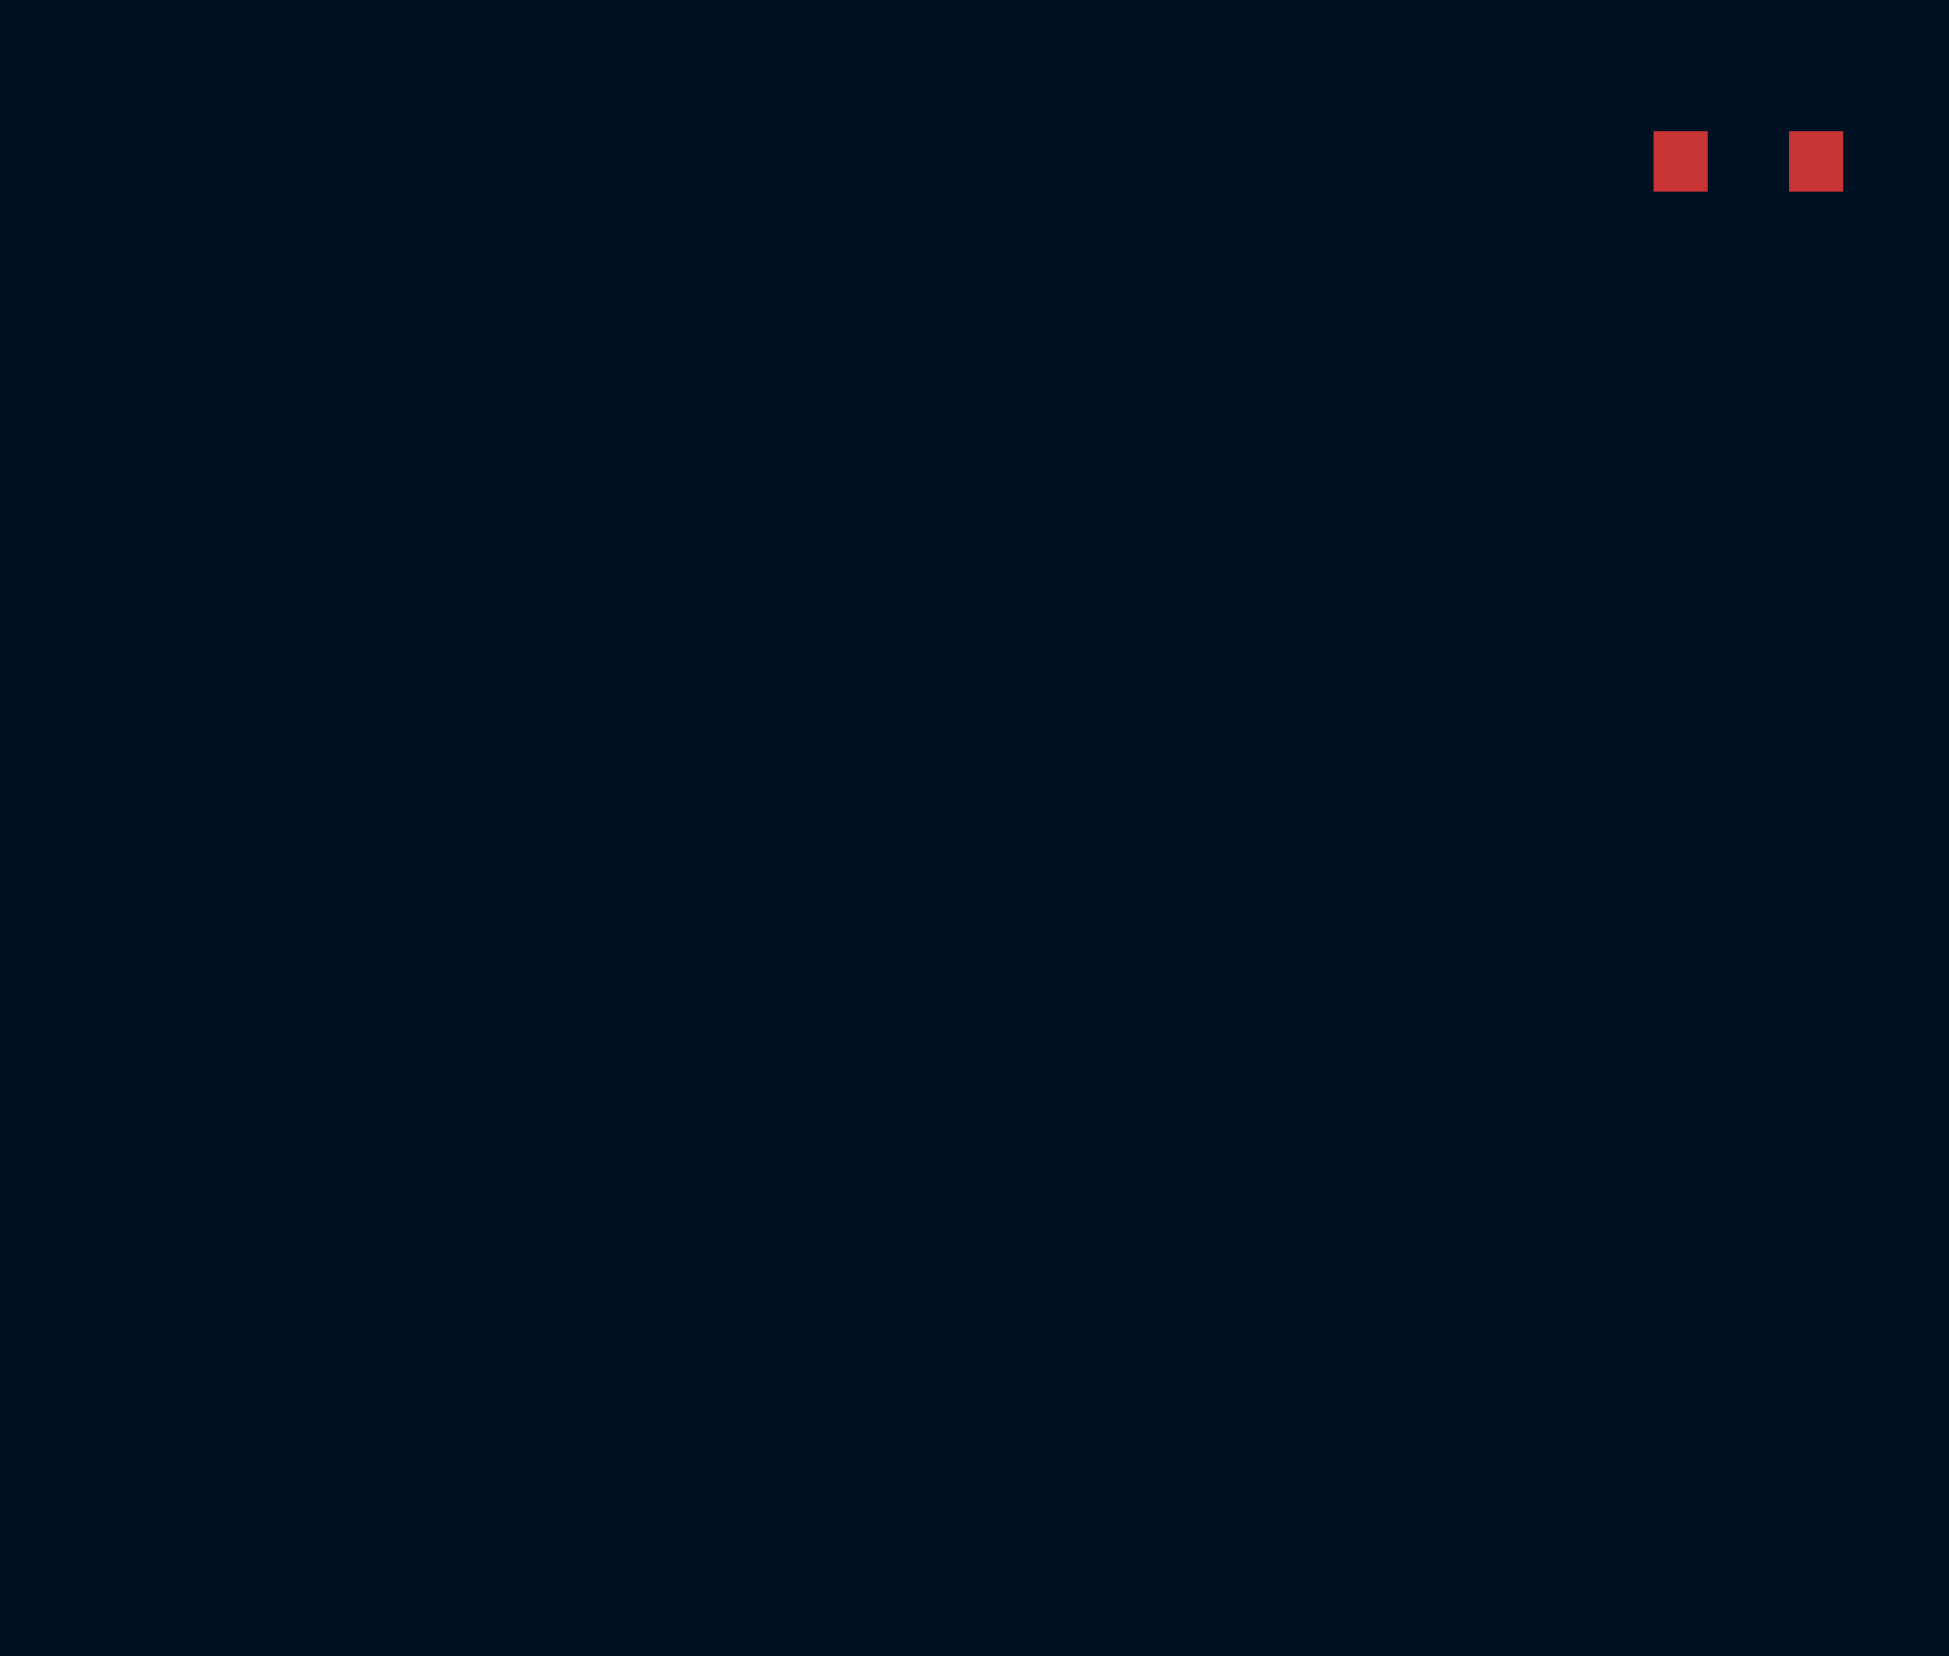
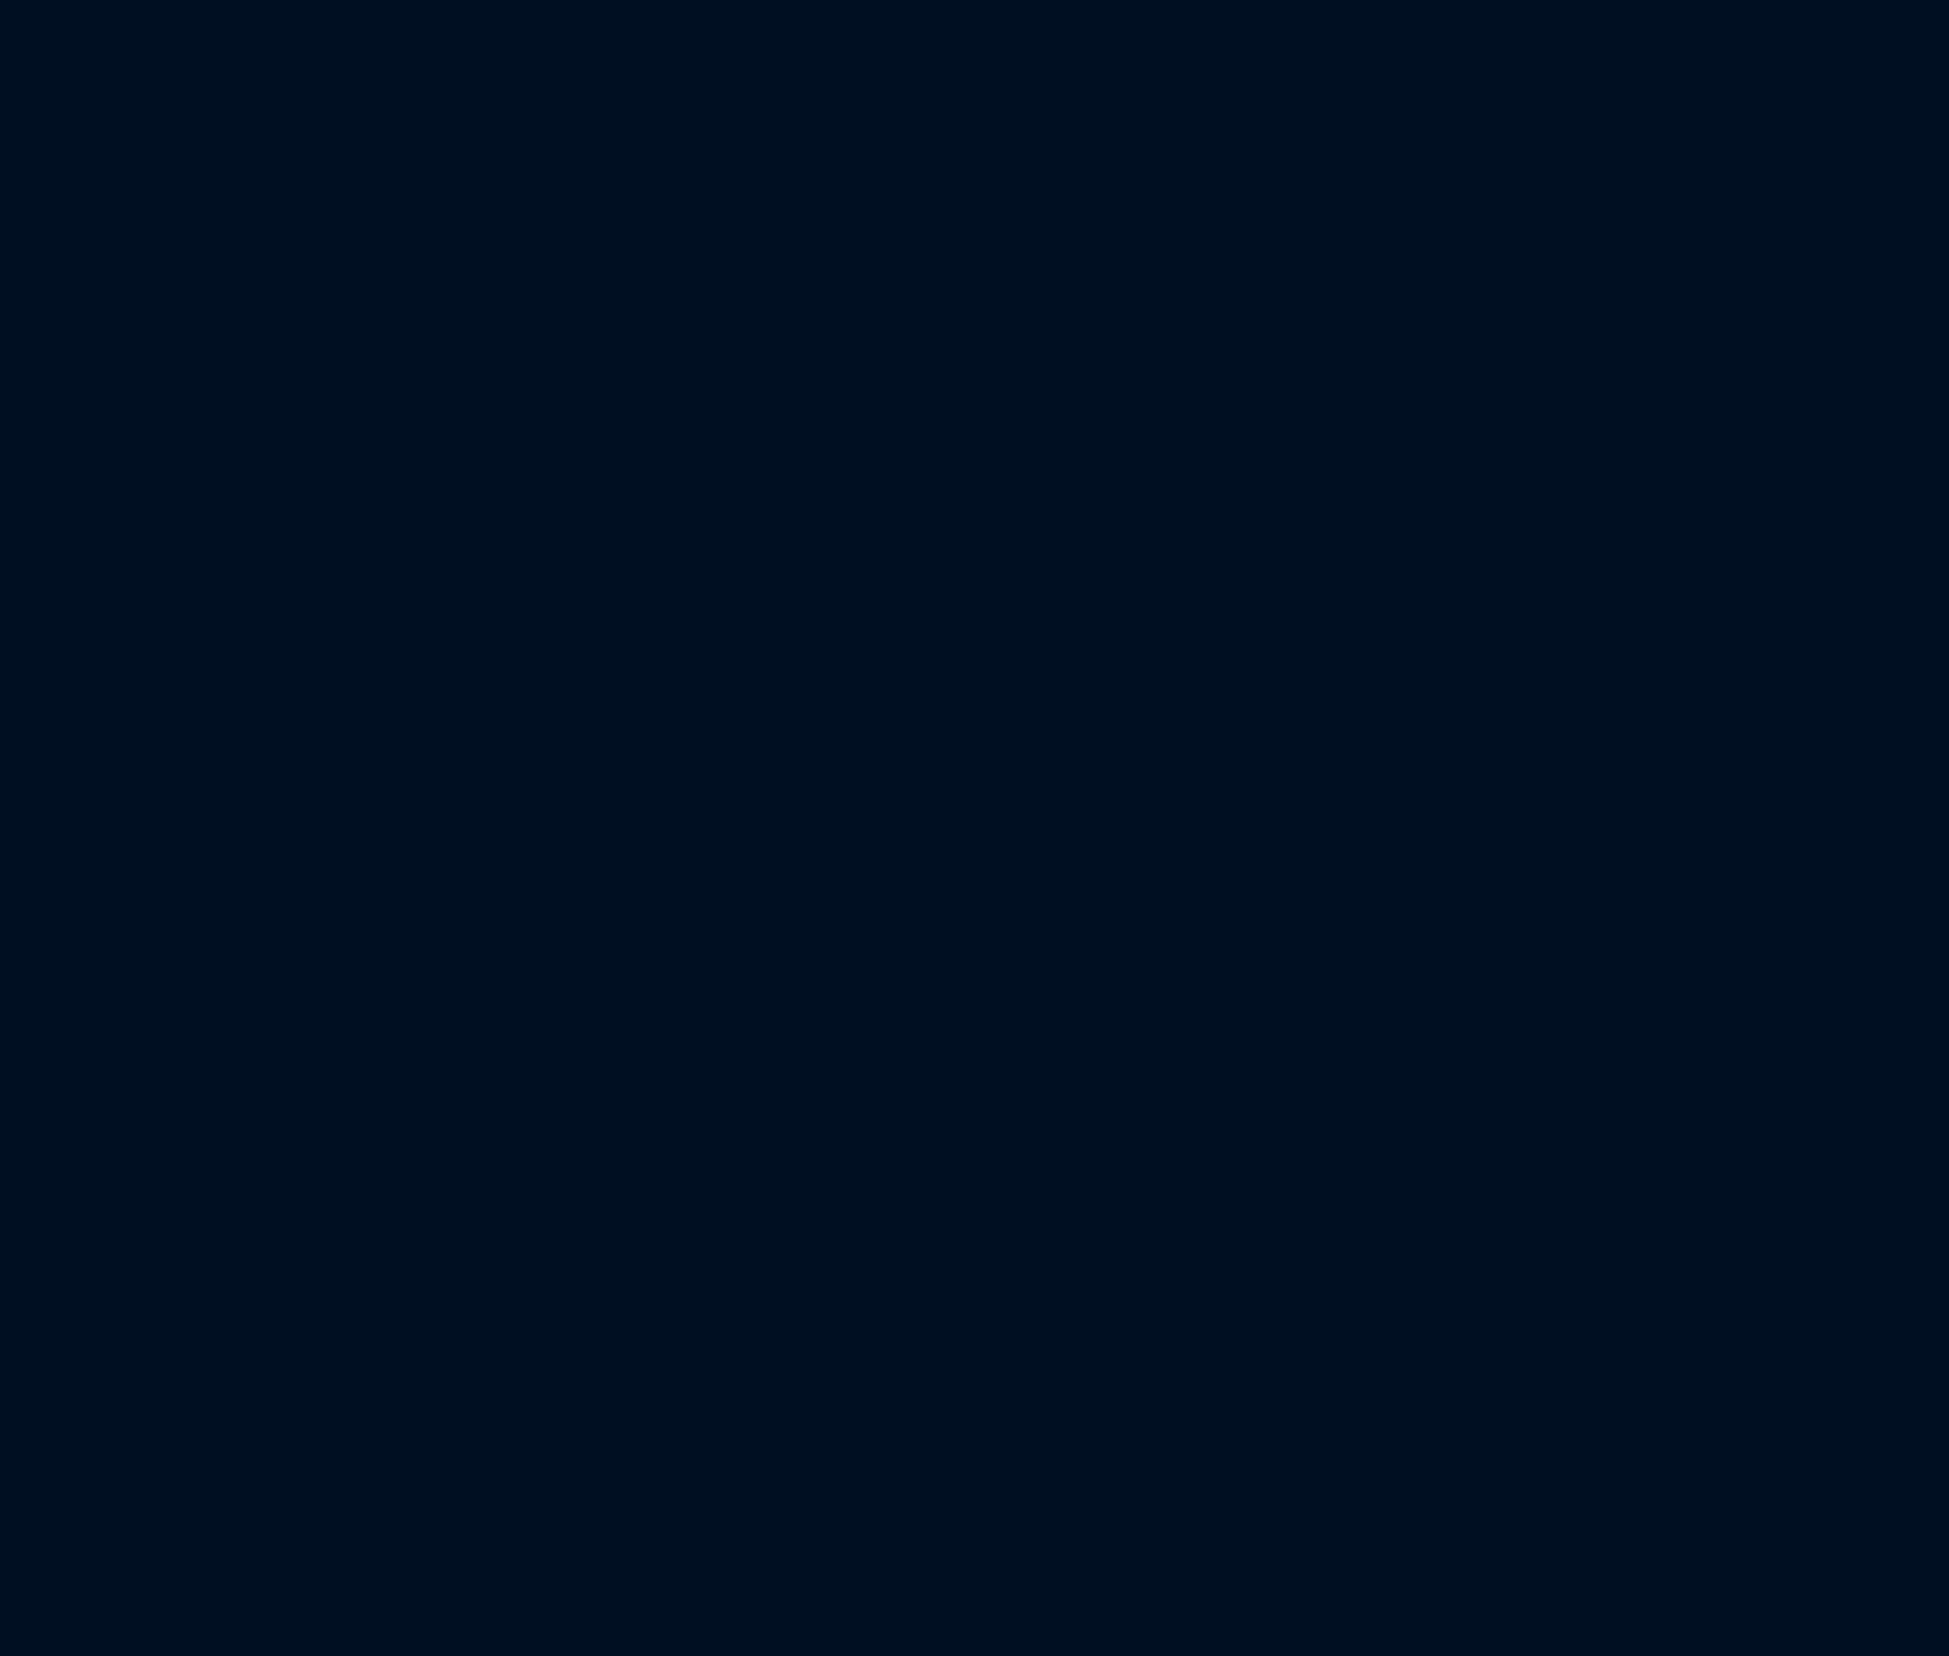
part: (1748, 161) -> none

